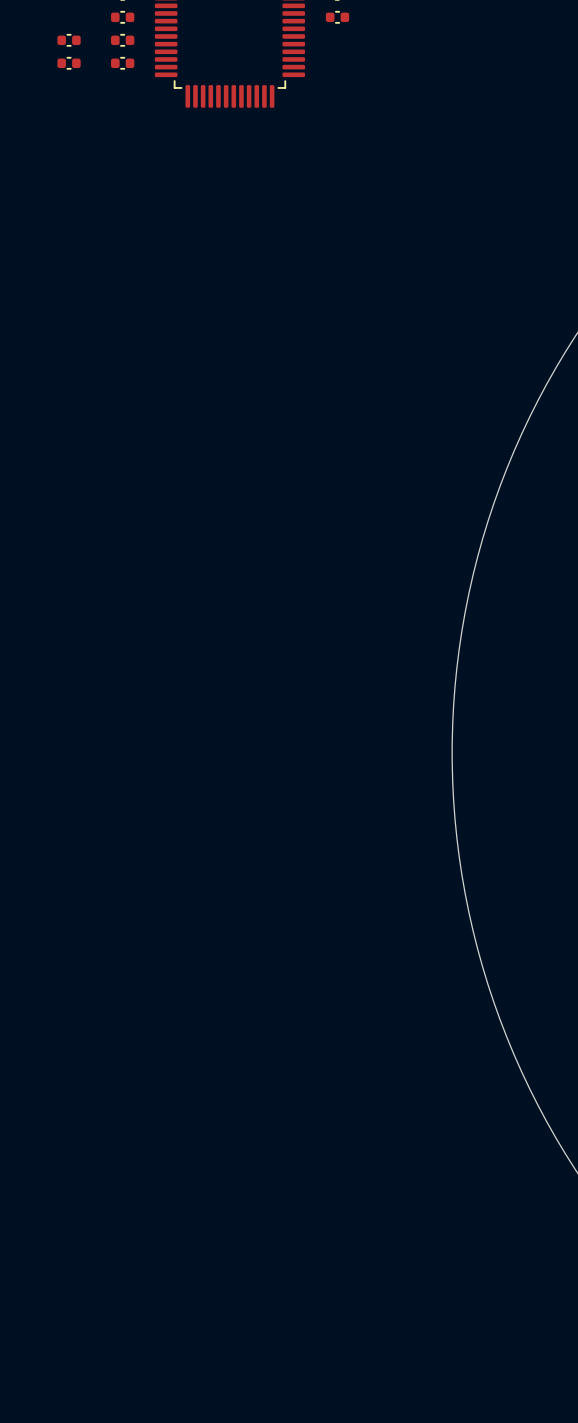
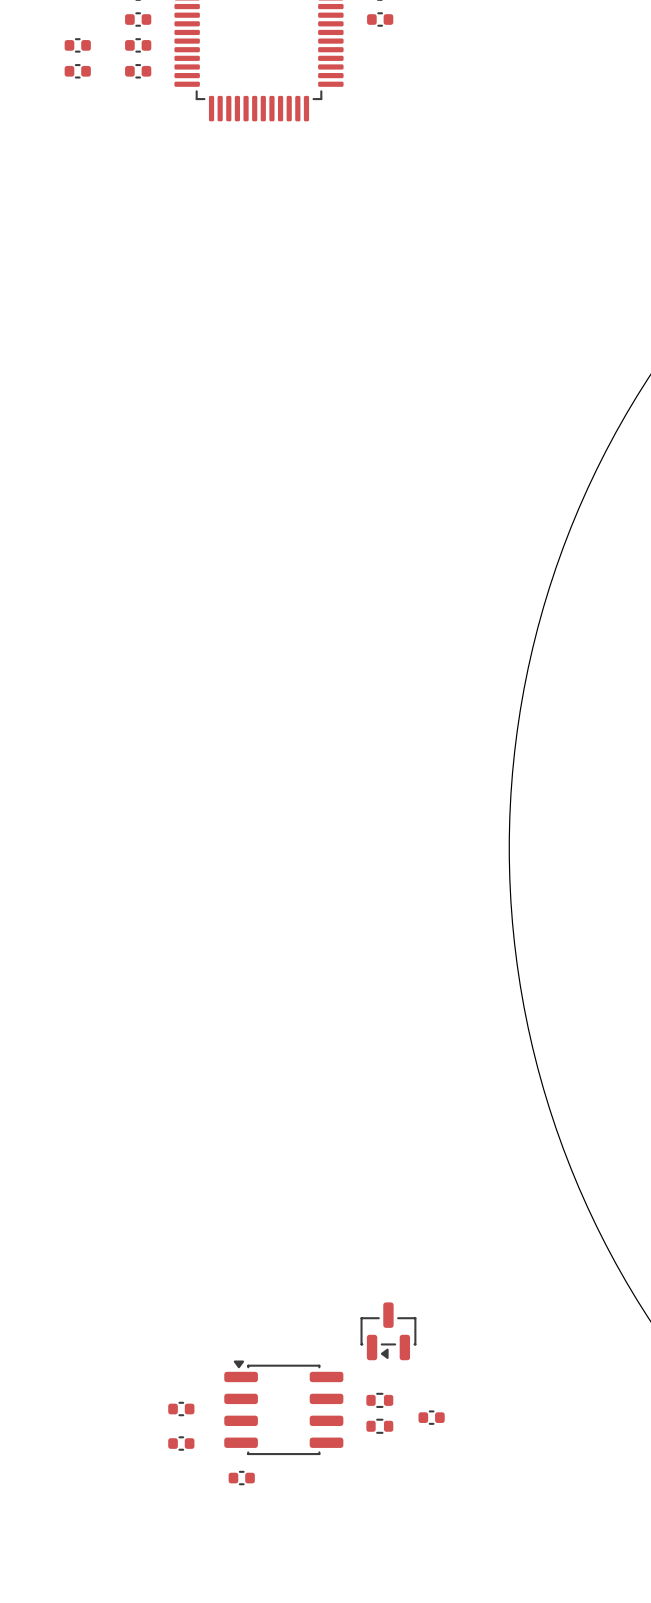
part: none -> (388, 1331)
part: none -> (379, 1400)
part: none -> (283, 1407)
part: none -> (181, 1409)
part: none -> (431, 1417)
part: none -> (379, 1426)
part: none -> (181, 1443)
part: none -> (241, 1478)

